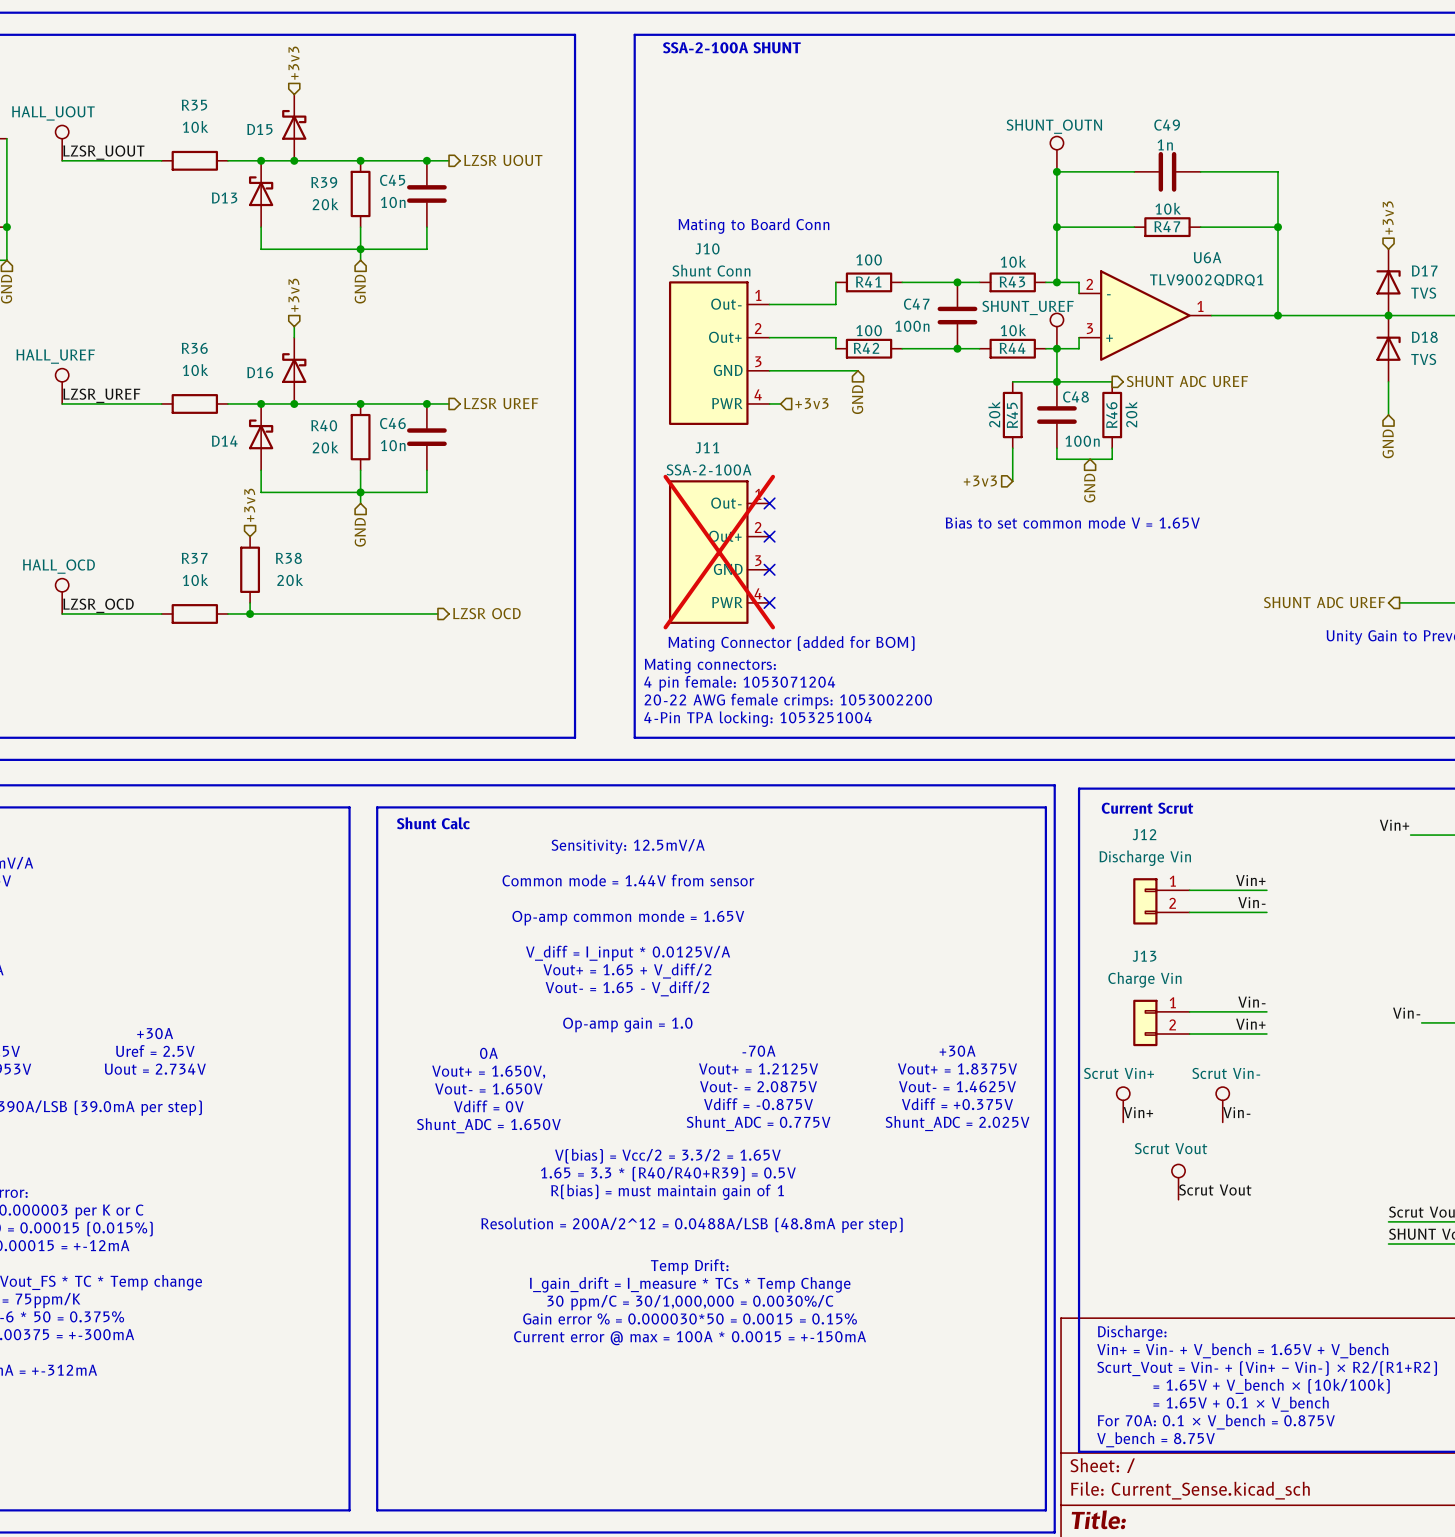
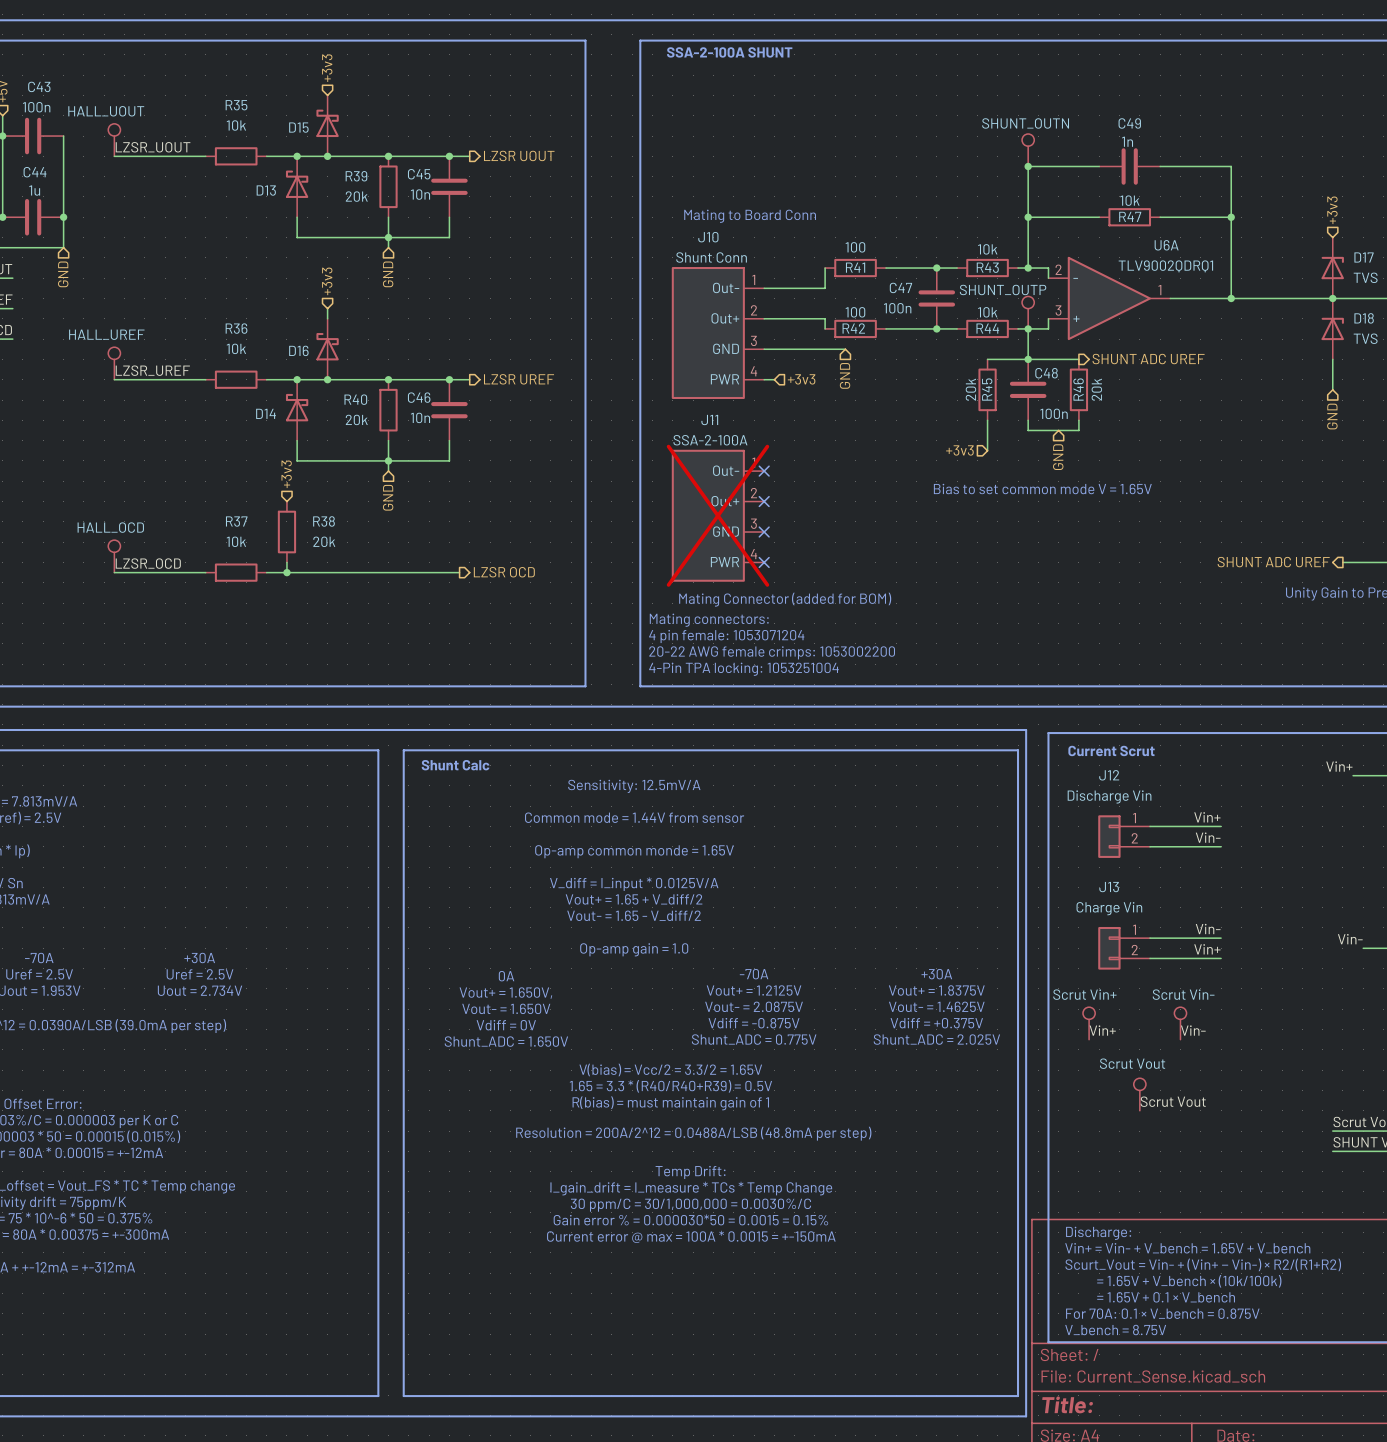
part value: SHUNT_UREF (1028, 307) -> SHUNT_OUTP (1003, 289)

